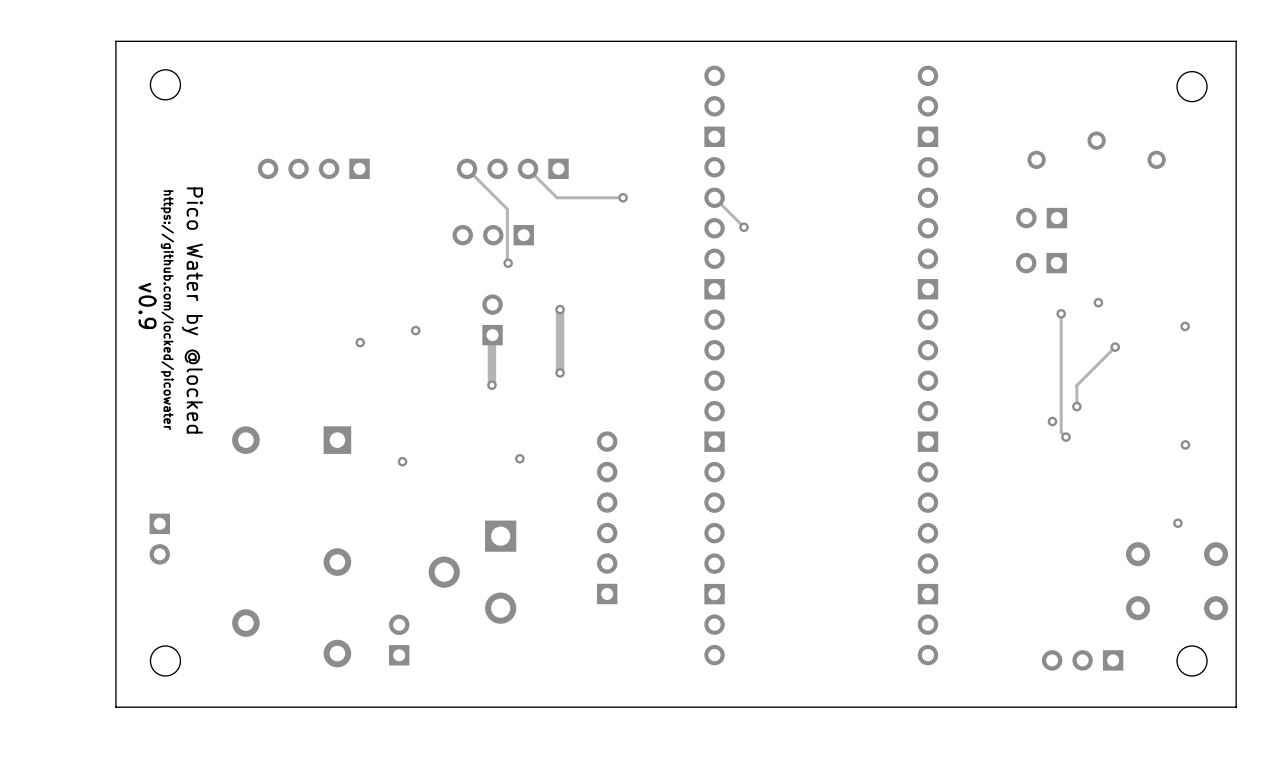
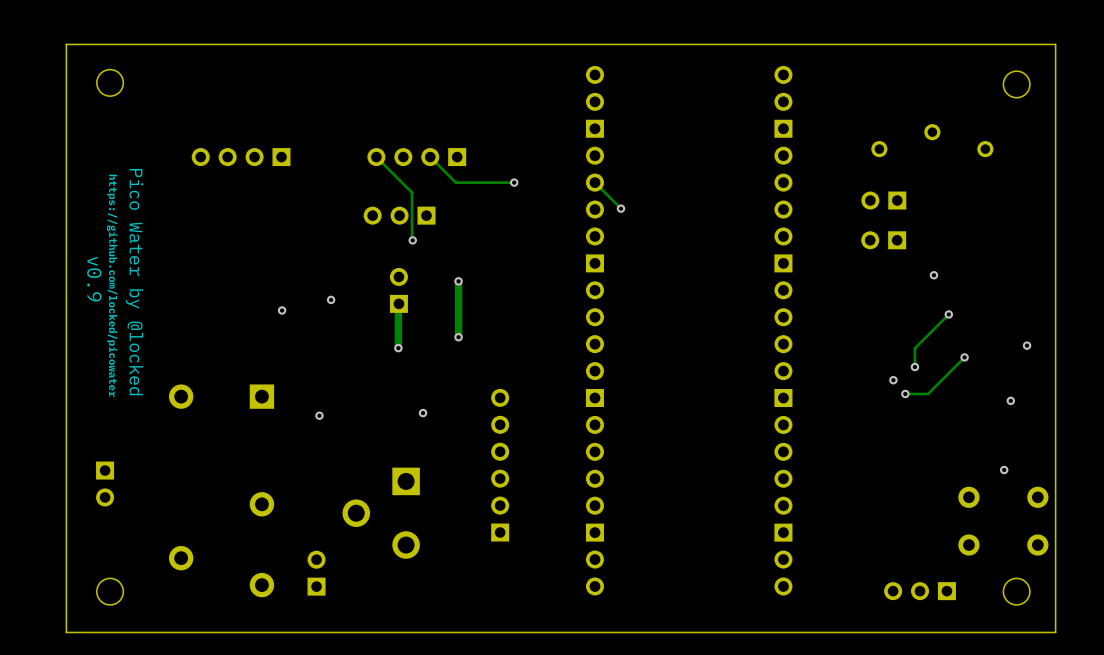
track: (1061, 313) (1061, 432) (1066, 437) -> none
via: (1061, 313) -> none
via: (1185, 326) -> none
via: none -> (1027, 345)
track: none -> (964, 357) (928, 393) (909, 393)
via: none -> (964, 357)

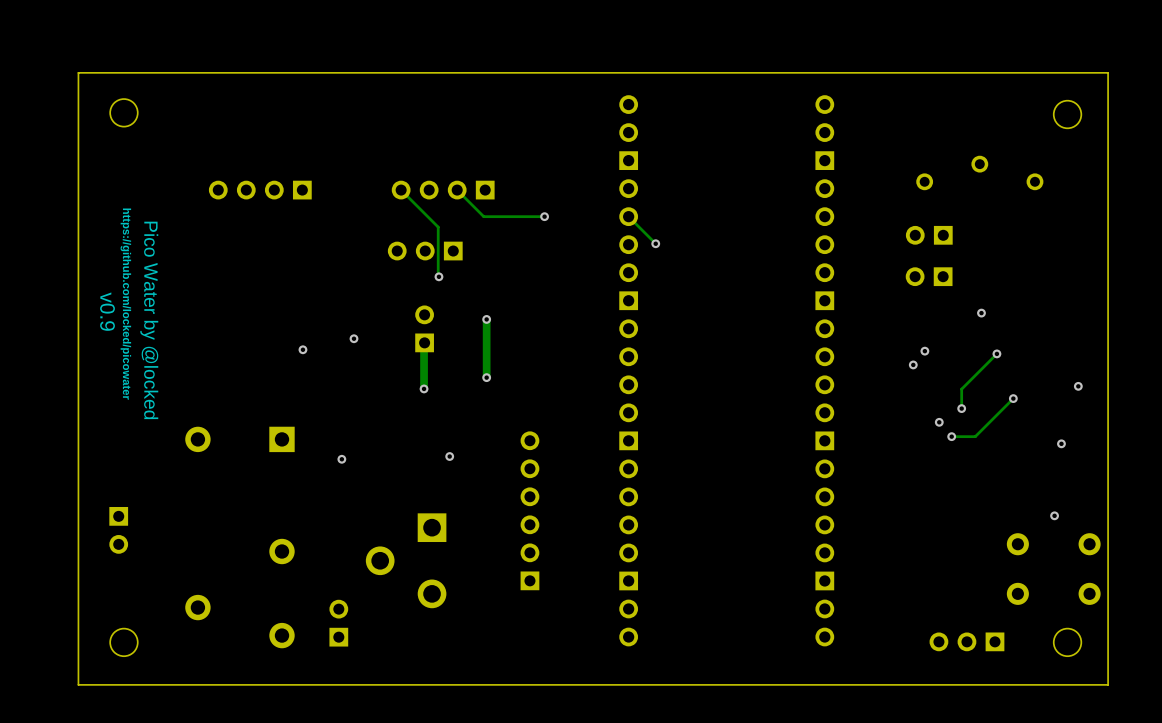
via: none -> (924, 351)
via: none -> (913, 364)

